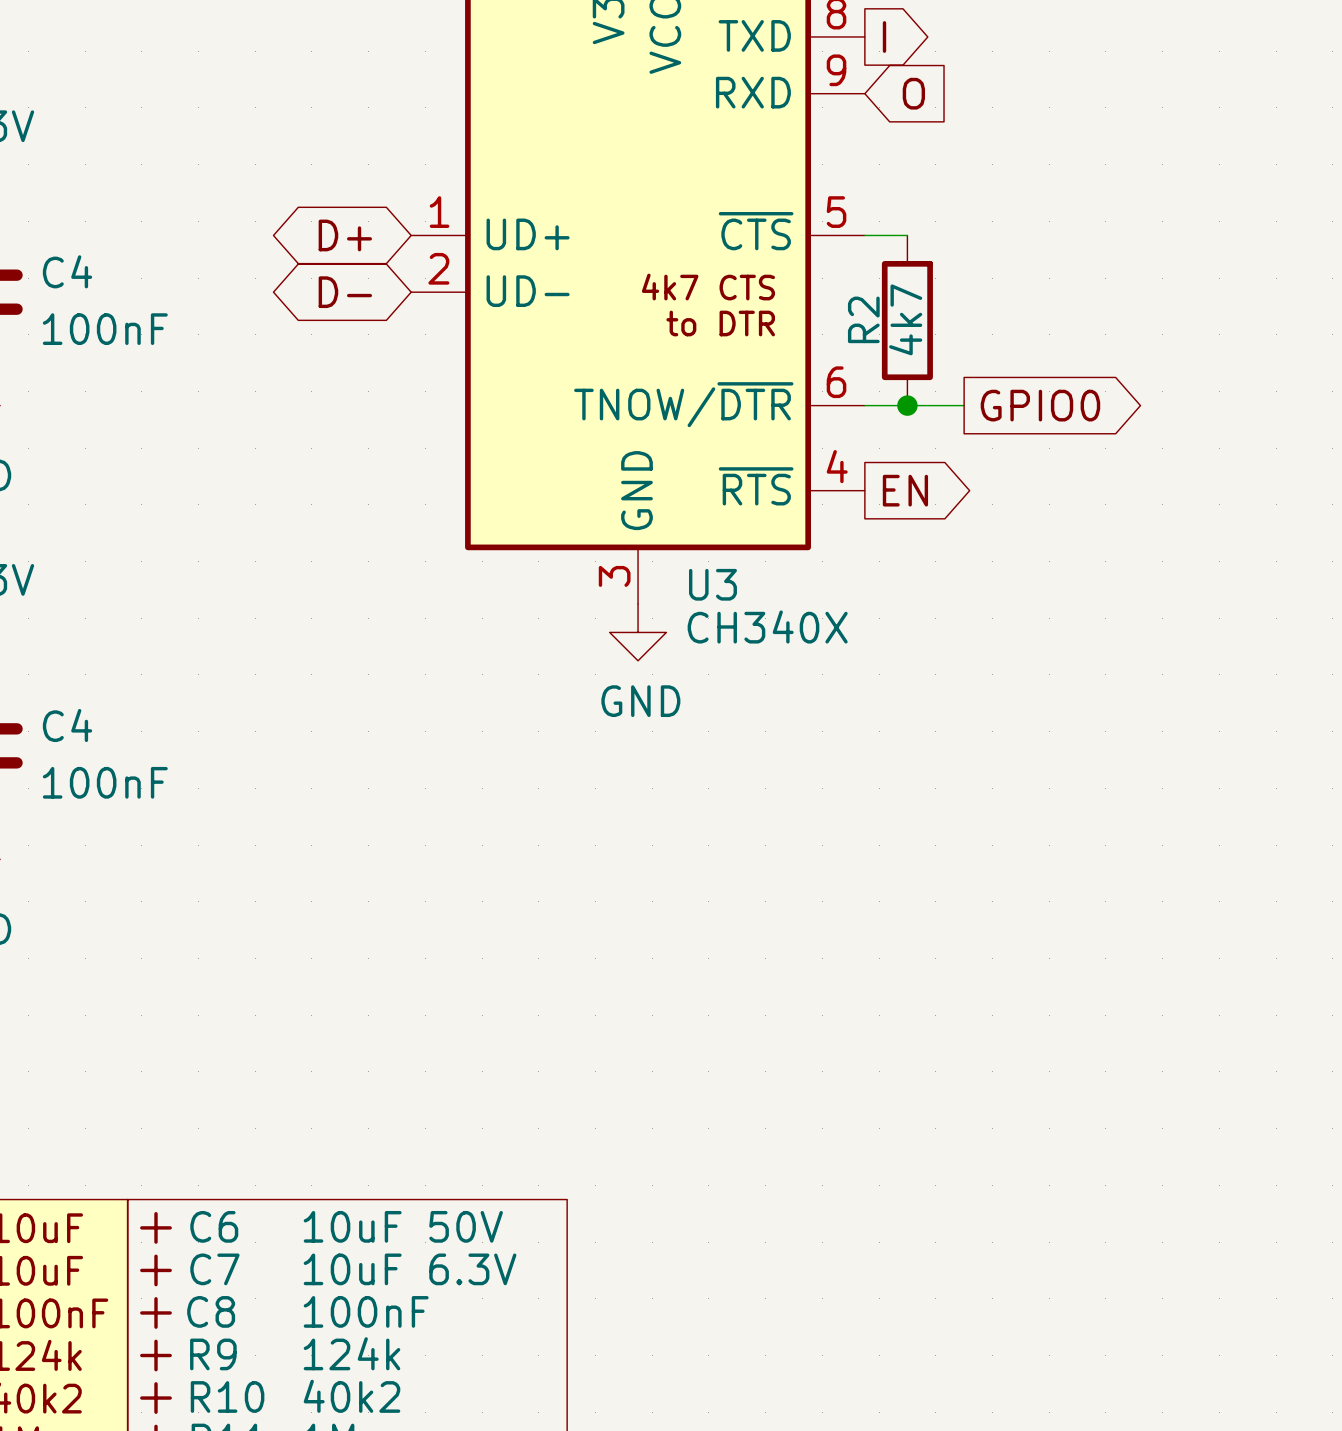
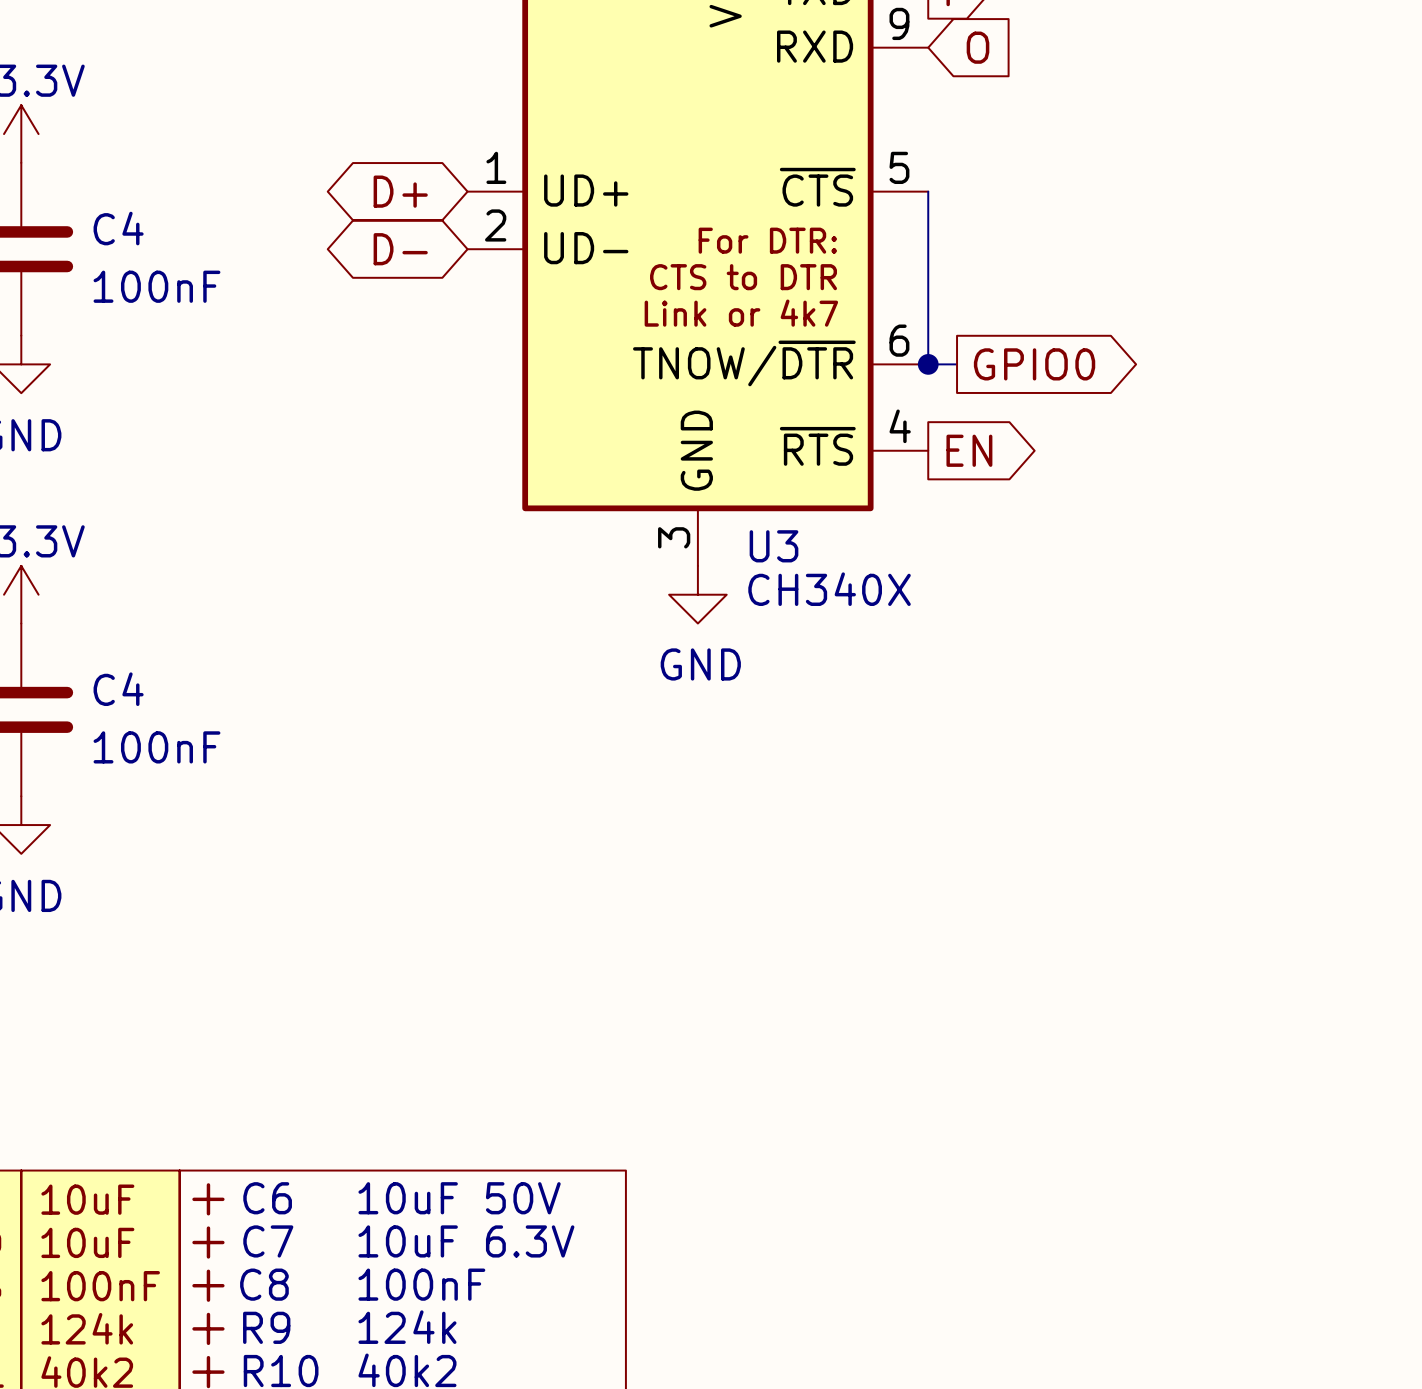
wire: (864, 235) (907, 235) -> (928, 191) (928, 364)
U3 text: none -> For DTR: (767, 240)
U3 text: 4k7 CTS (708, 287) -> none
U3 text: none -> CTS to DTR (743, 277)
R2: 4k7 (907, 320) -> none
U3 text: to DTR (720, 323) -> none
U3 text: none -> Link or 4k7 (741, 313)
wire: (893, 405) (964, 405) -> none
junction position: (907, 405) -> (928, 364)
global label position: GPIO0 (1040, 405) -> GPIO0 (1034, 364)

